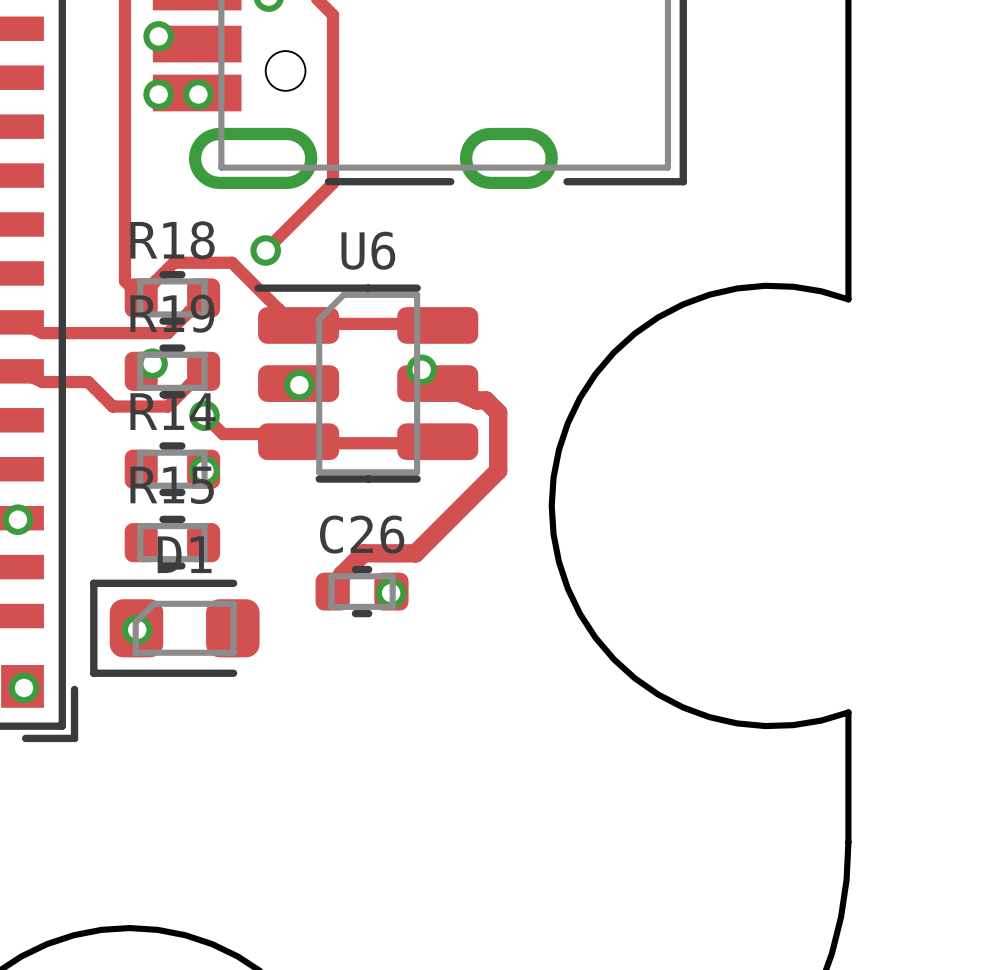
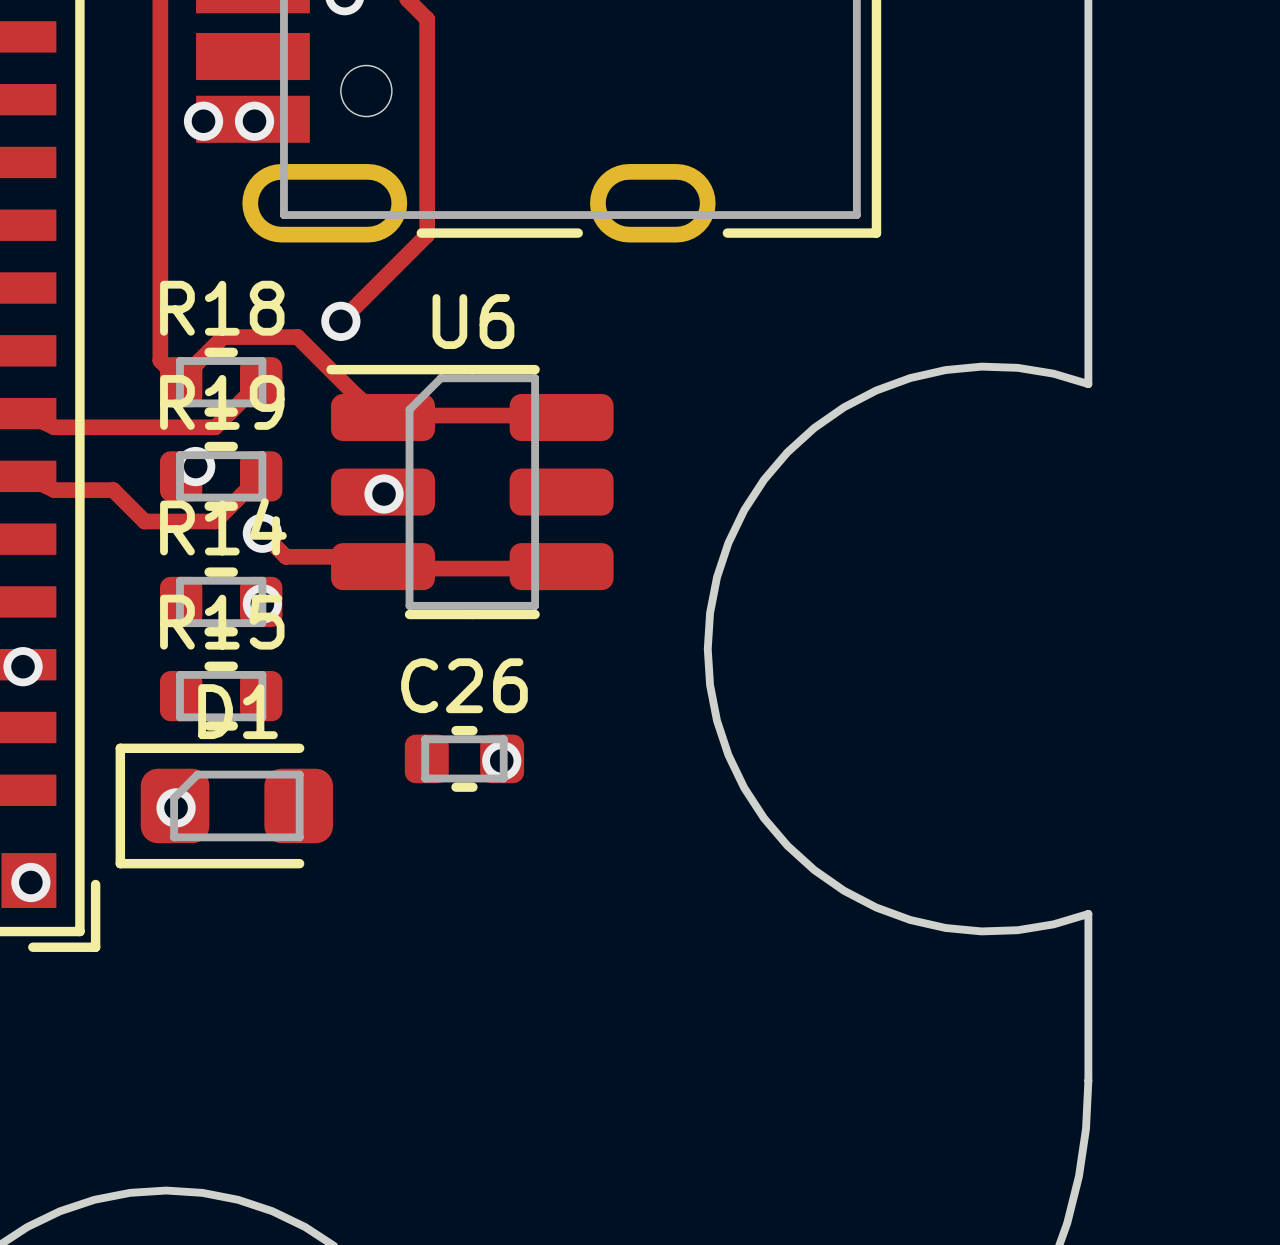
via: (158, 36) -> none
track: (421, 369) (437, 383) (476, 400) (485, 400) (498, 412) (498, 470) (415, 553) (363, 553) (342, 574) (332, 591) -> none
via: (421, 369) -> none

